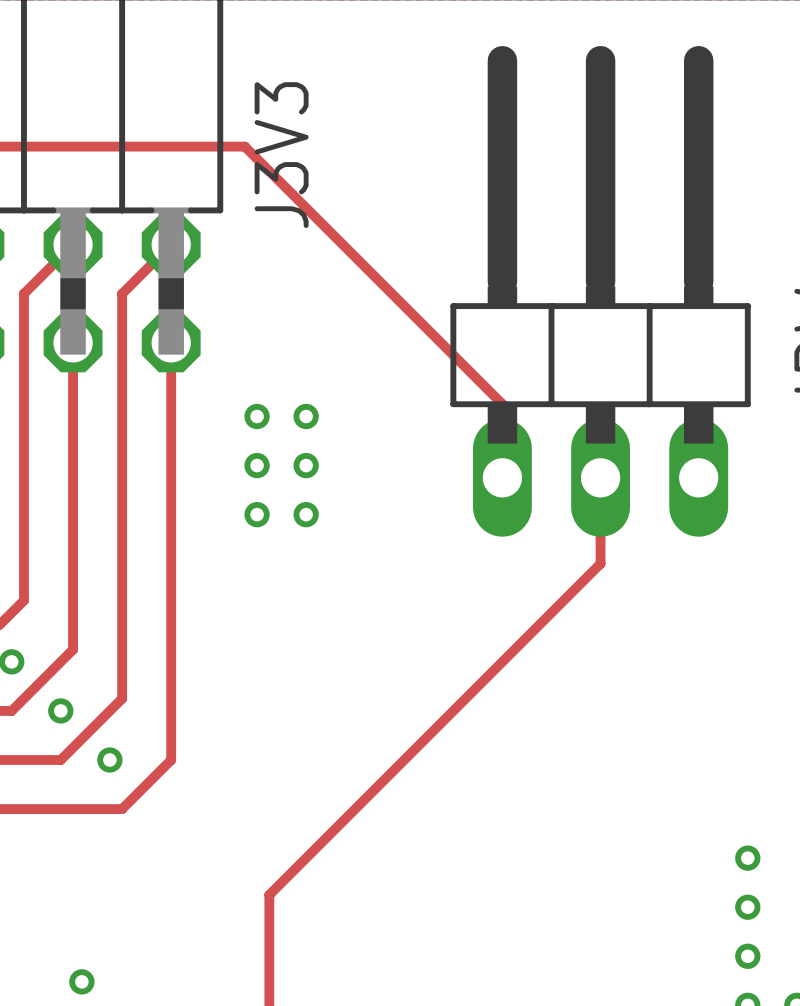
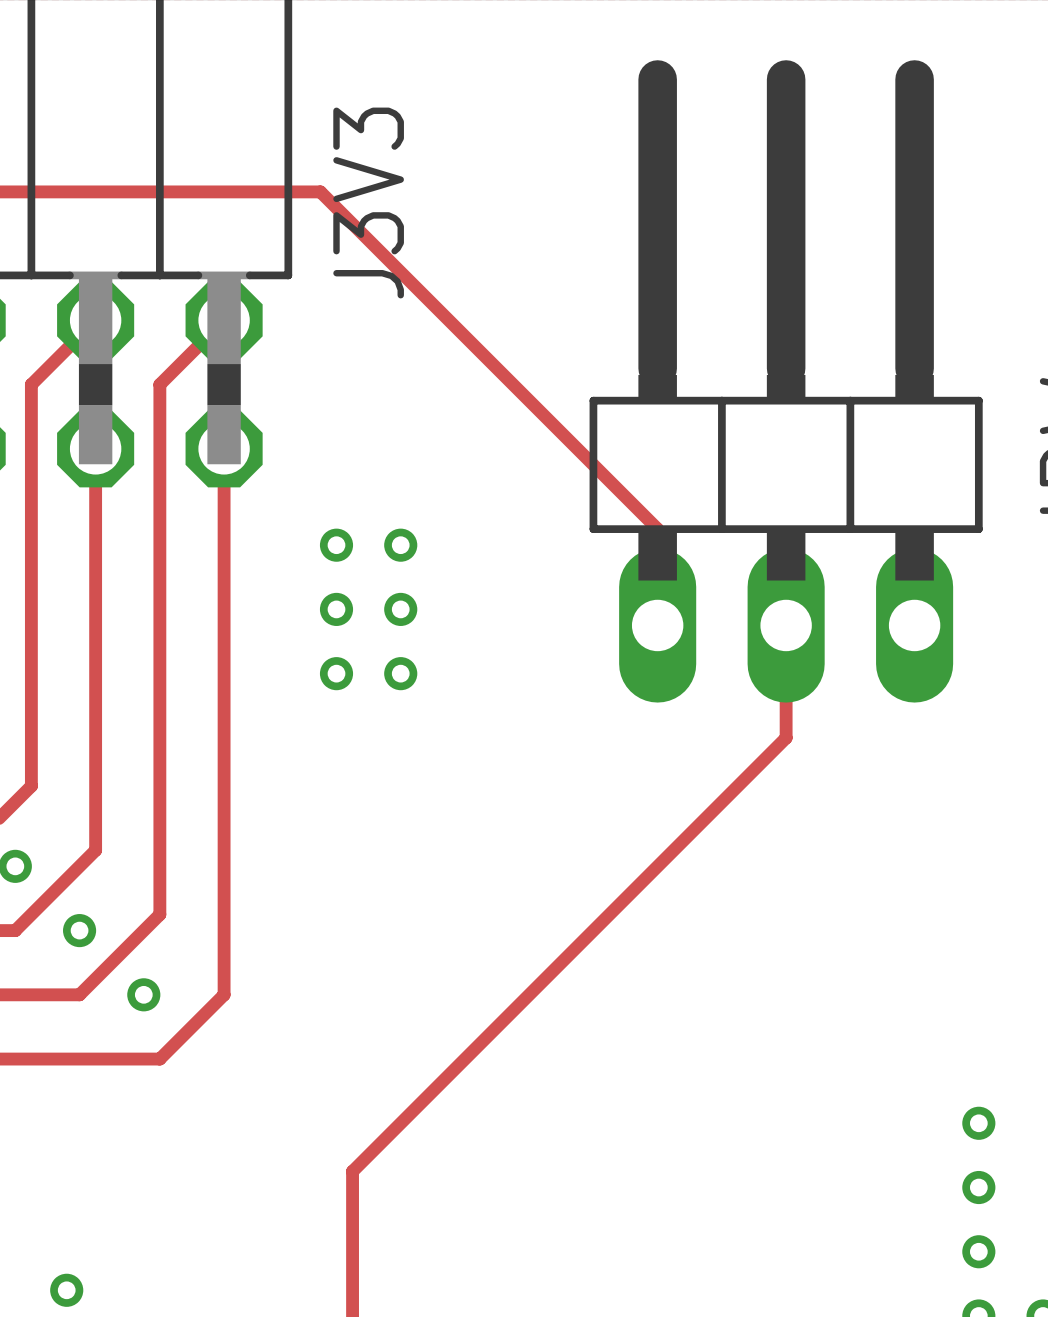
via position: (81, 981) -> (66, 1290)

